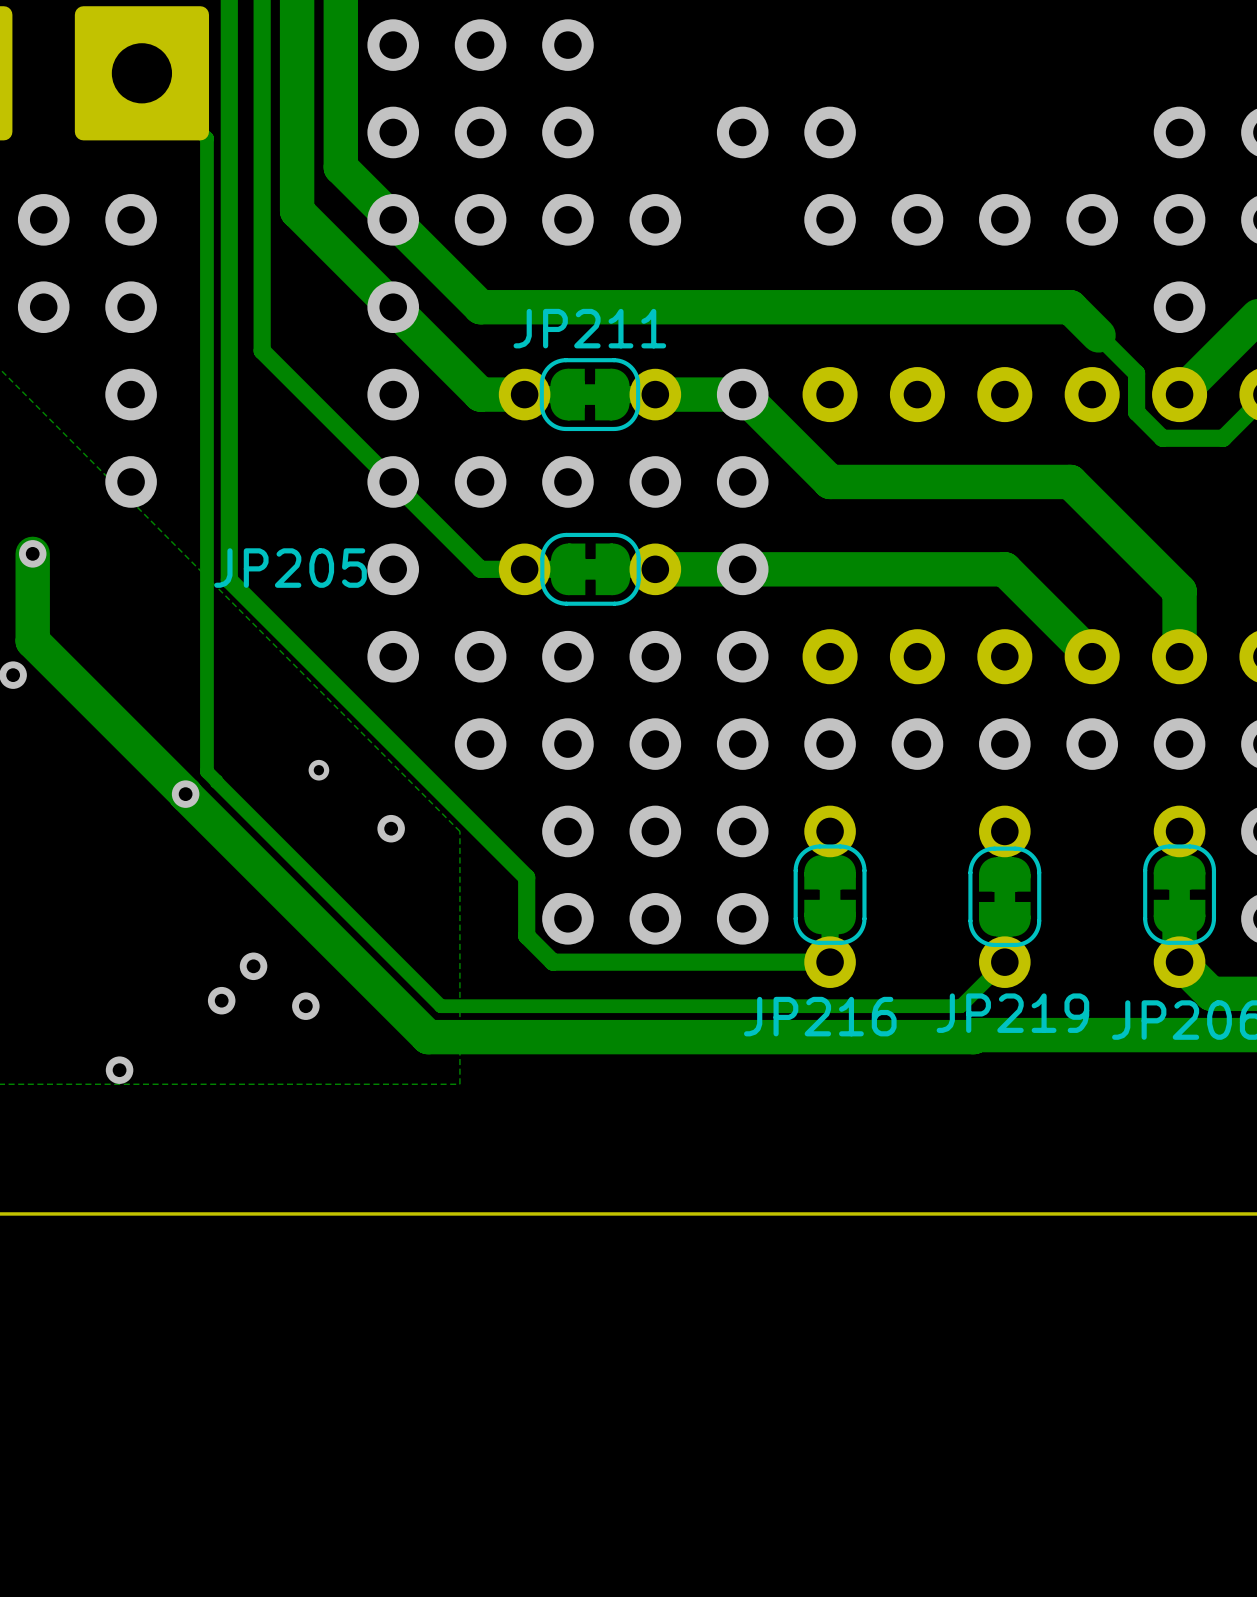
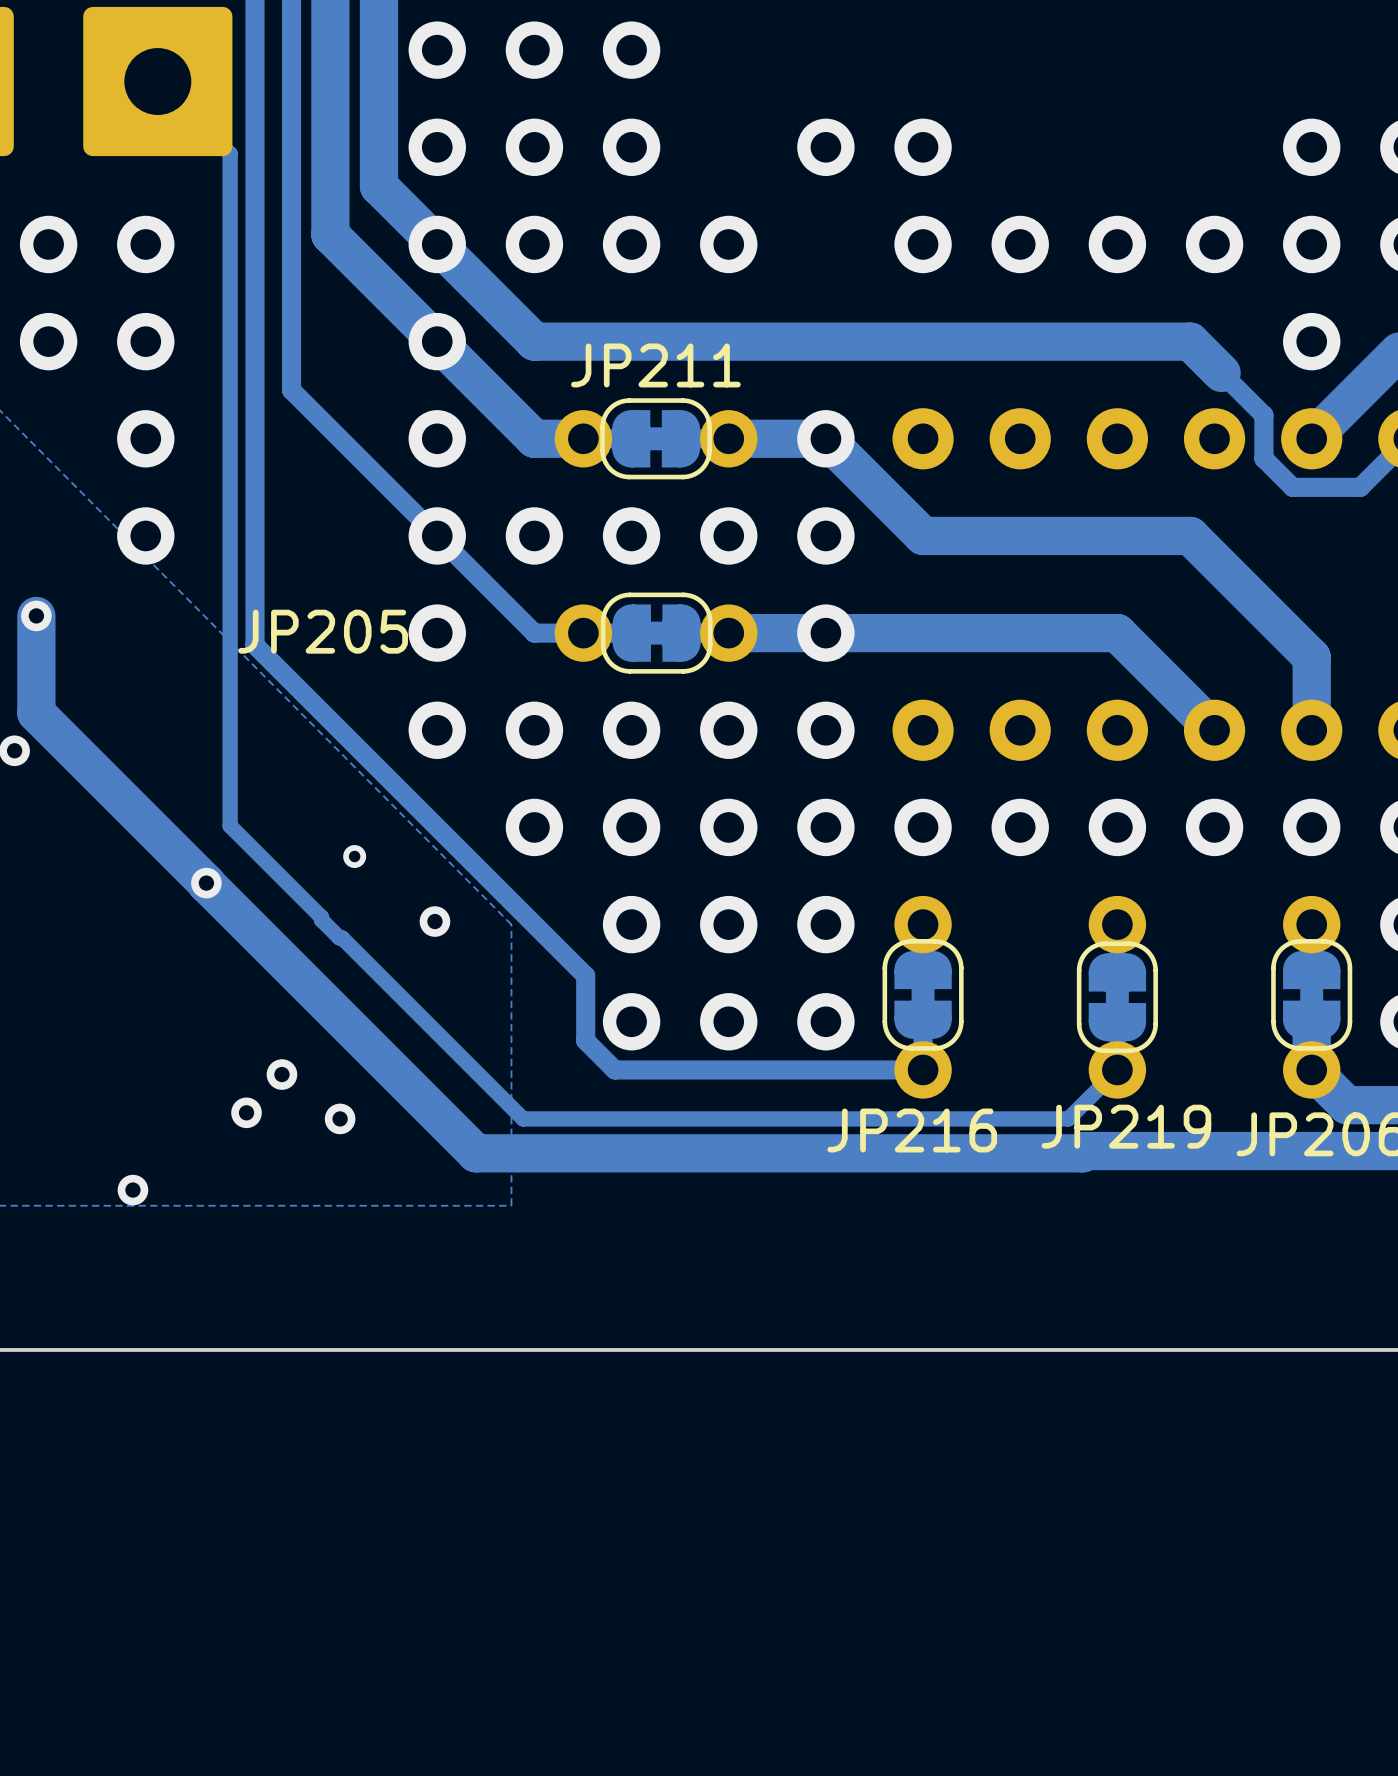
track: (206, 742) (206, 771) (216, 781) -> none
track: (216, 781) (440, 1006) (470, 1006) -> (230, 825) (321, 917) (321, 920) (339, 937) (342, 937) (523, 1118)

